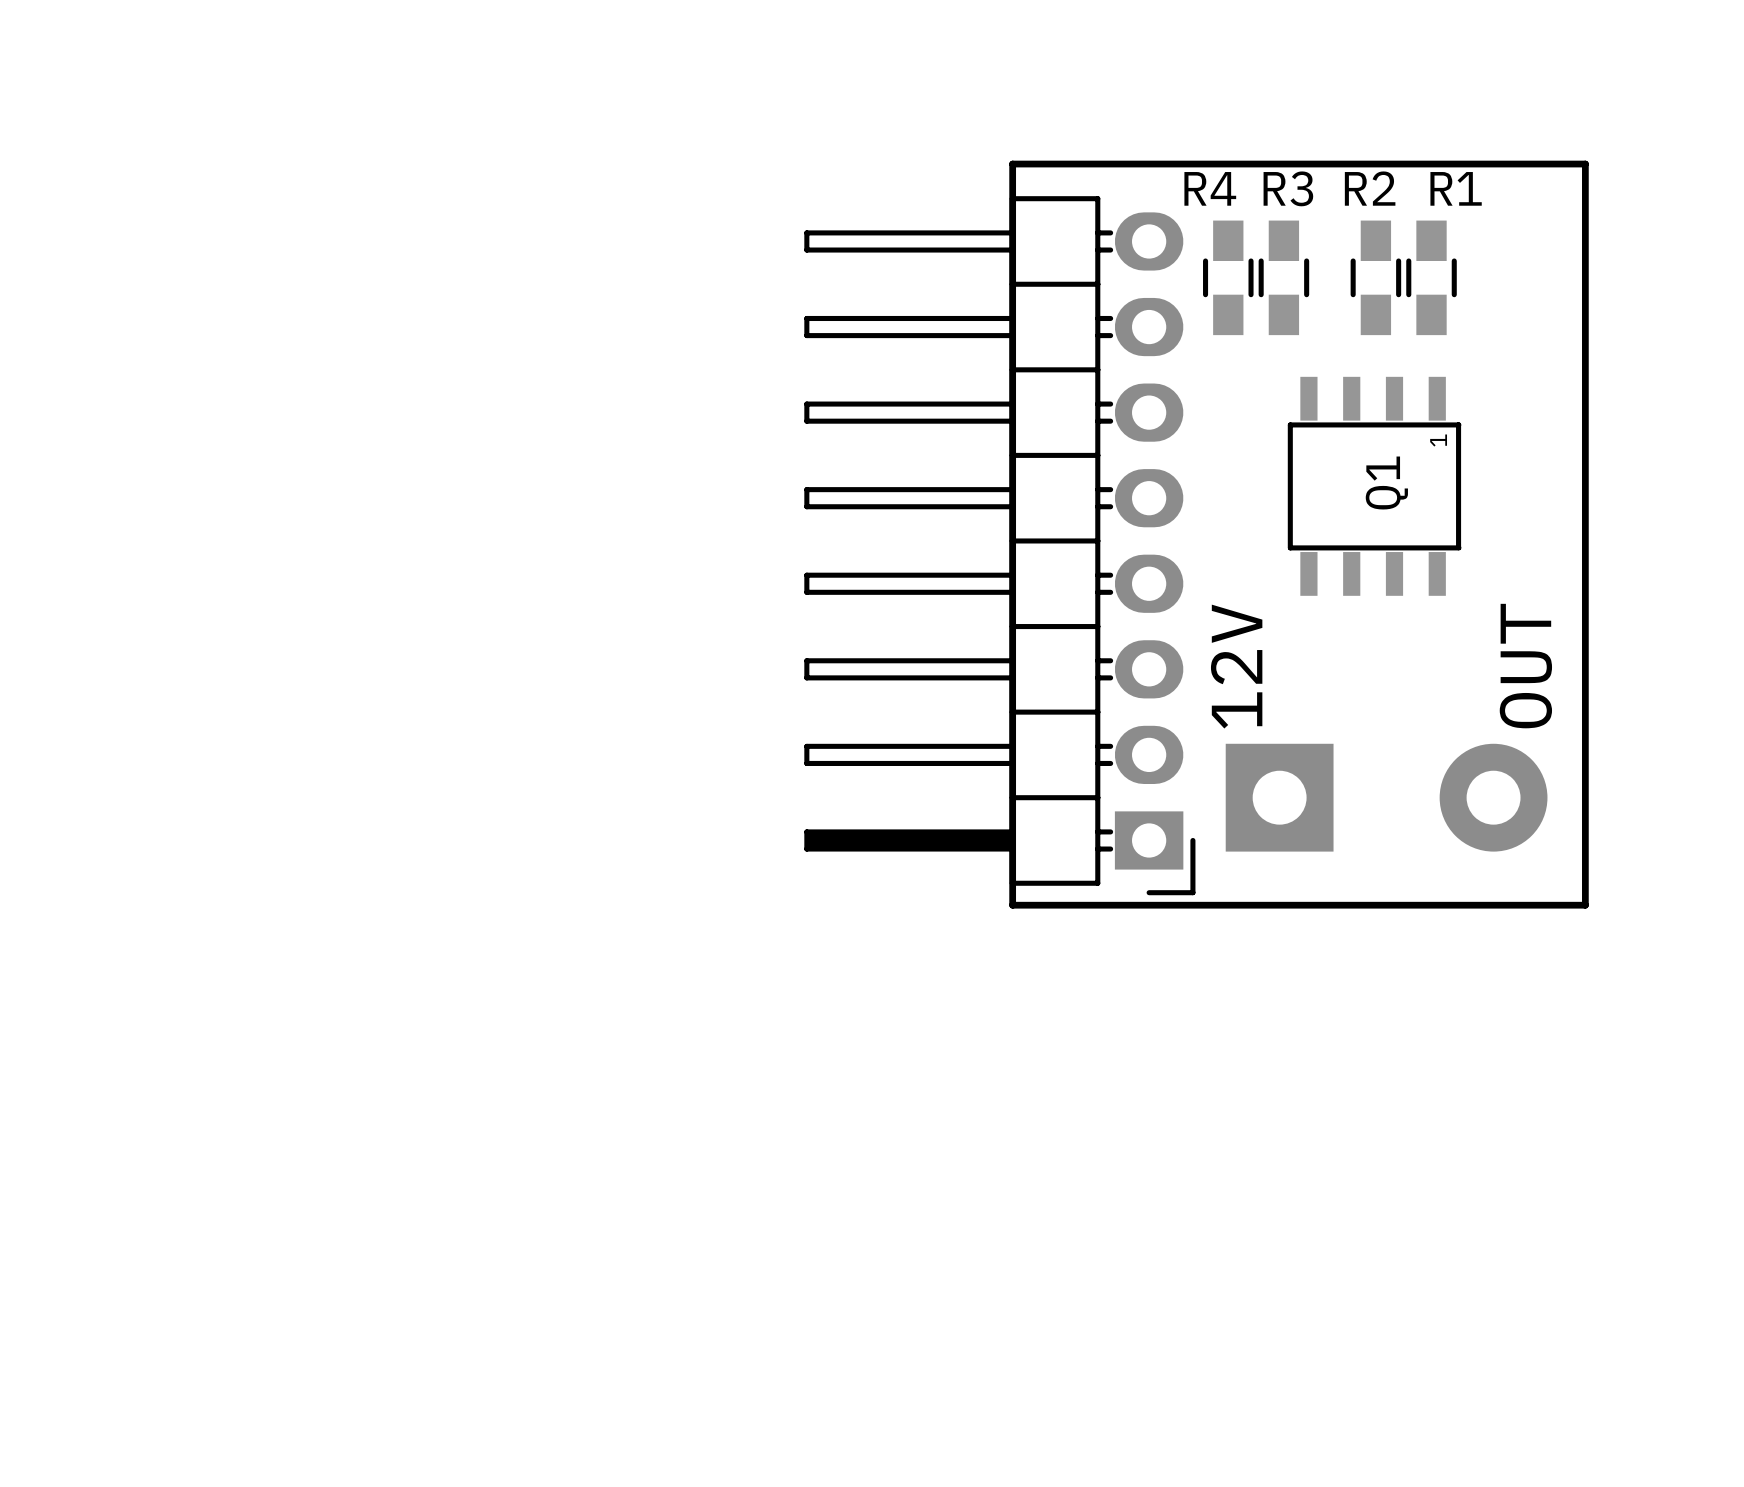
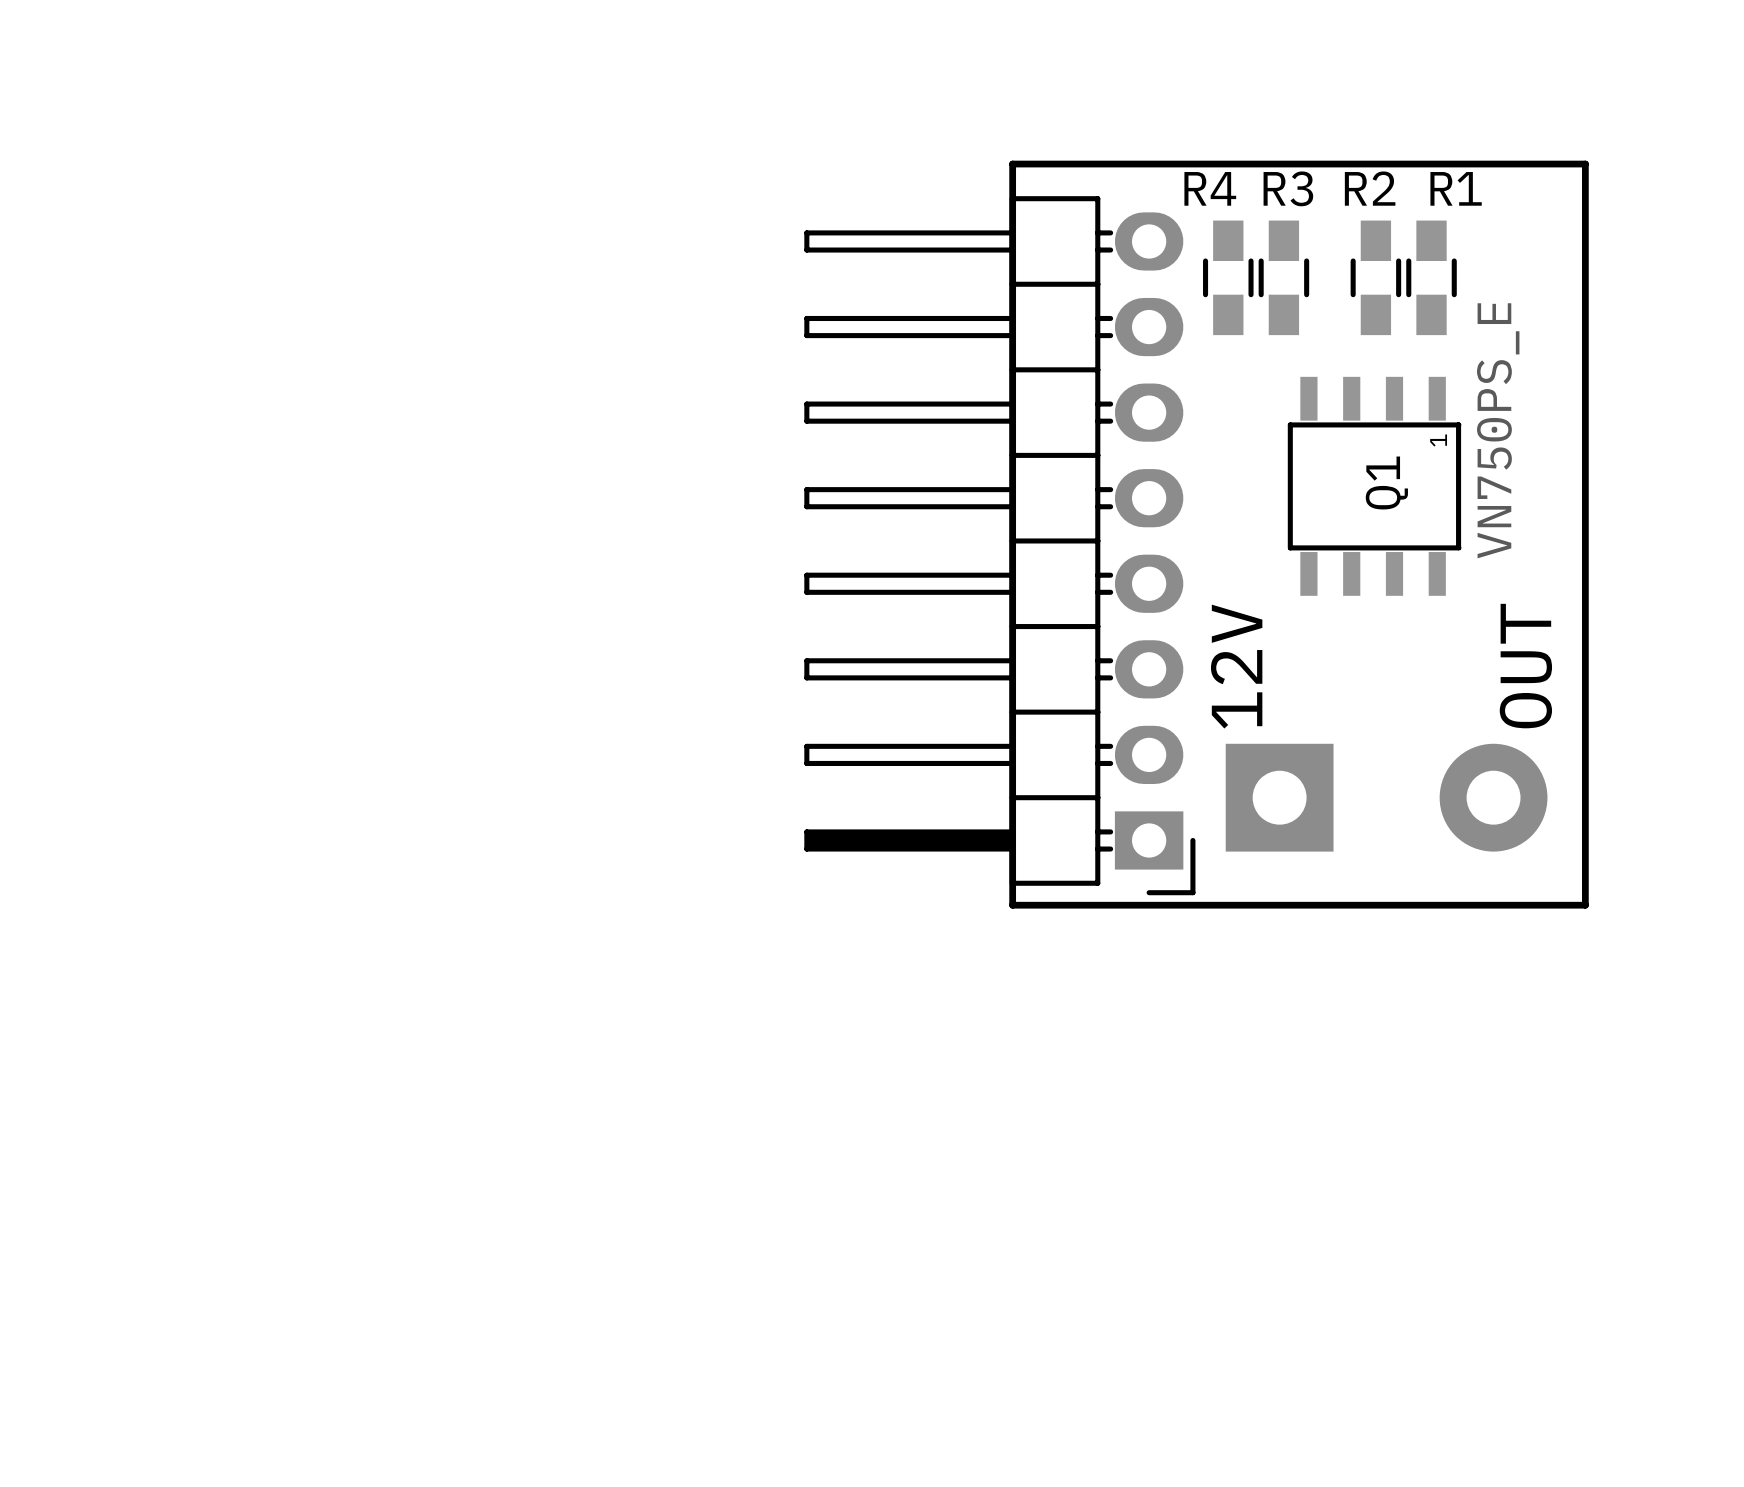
Q1 value: none -> VN750PS_E (1498, 430)

